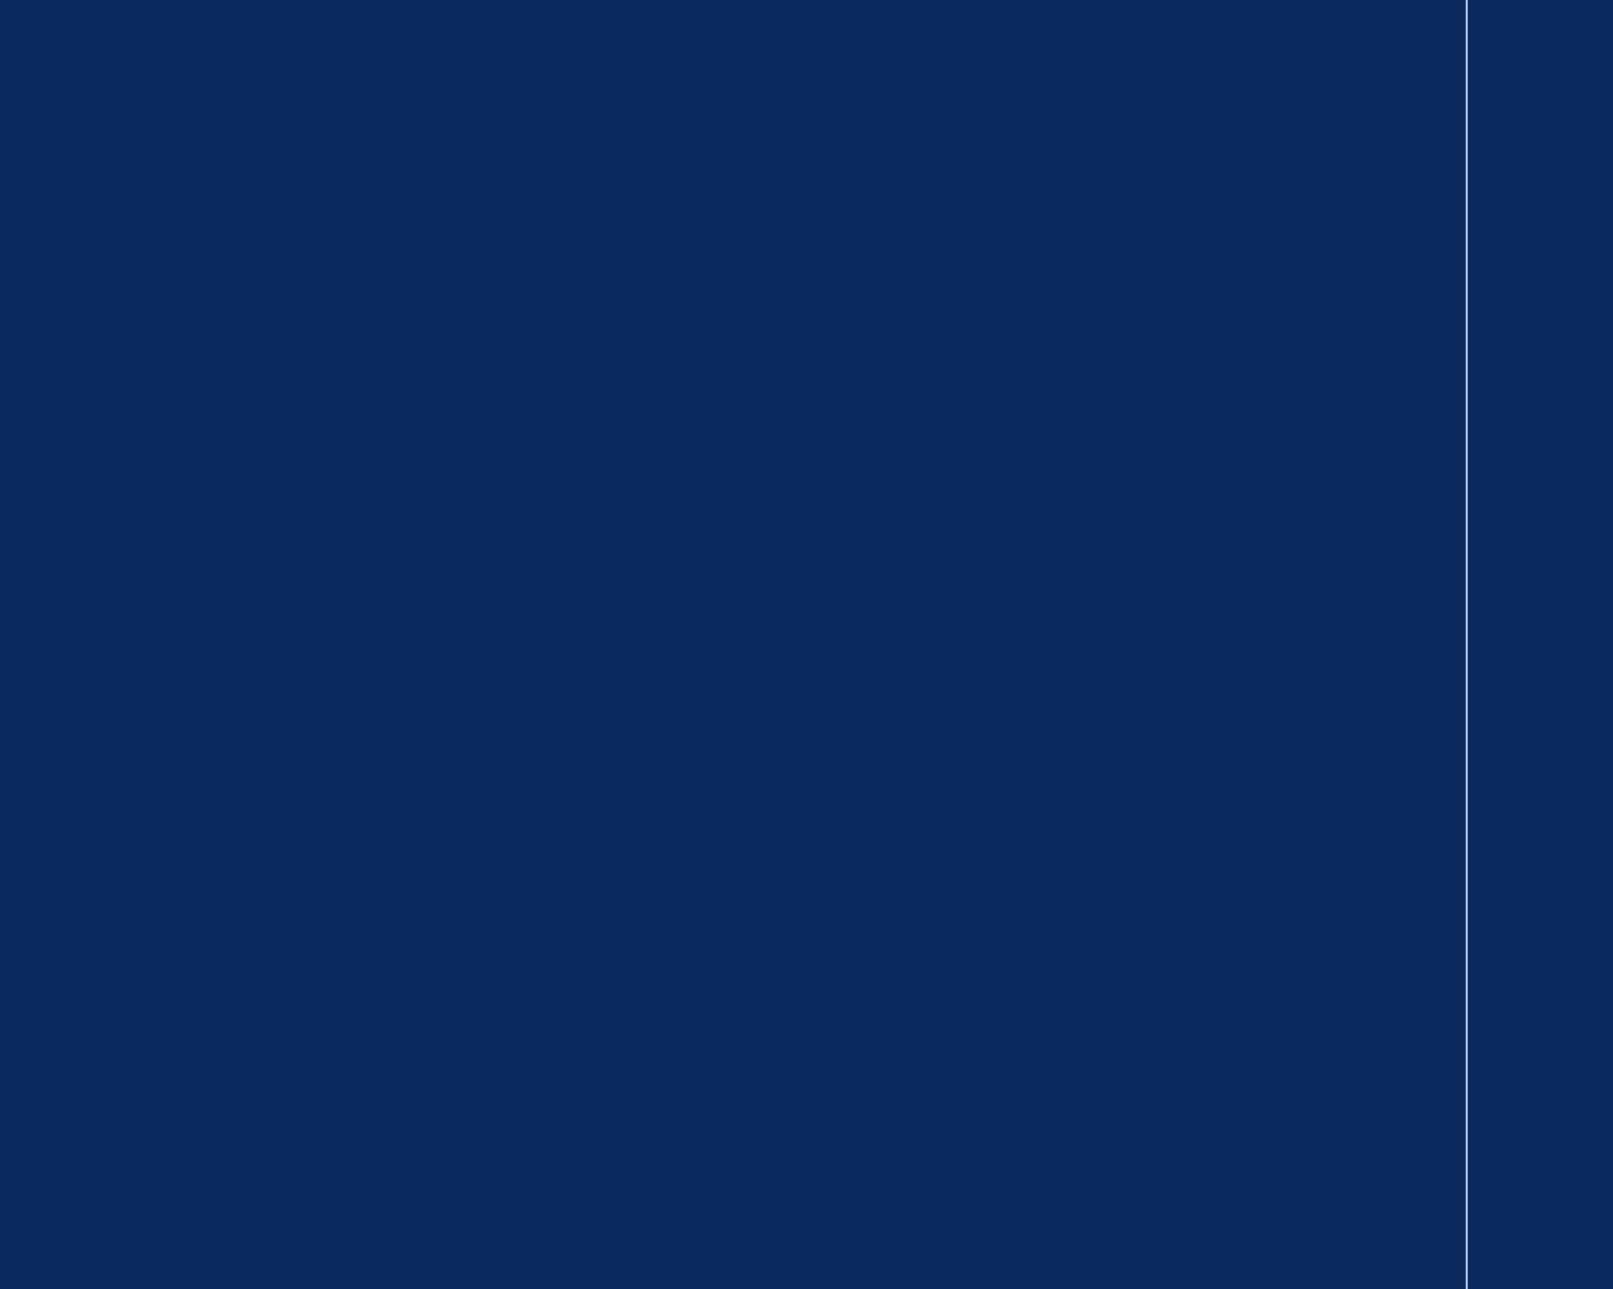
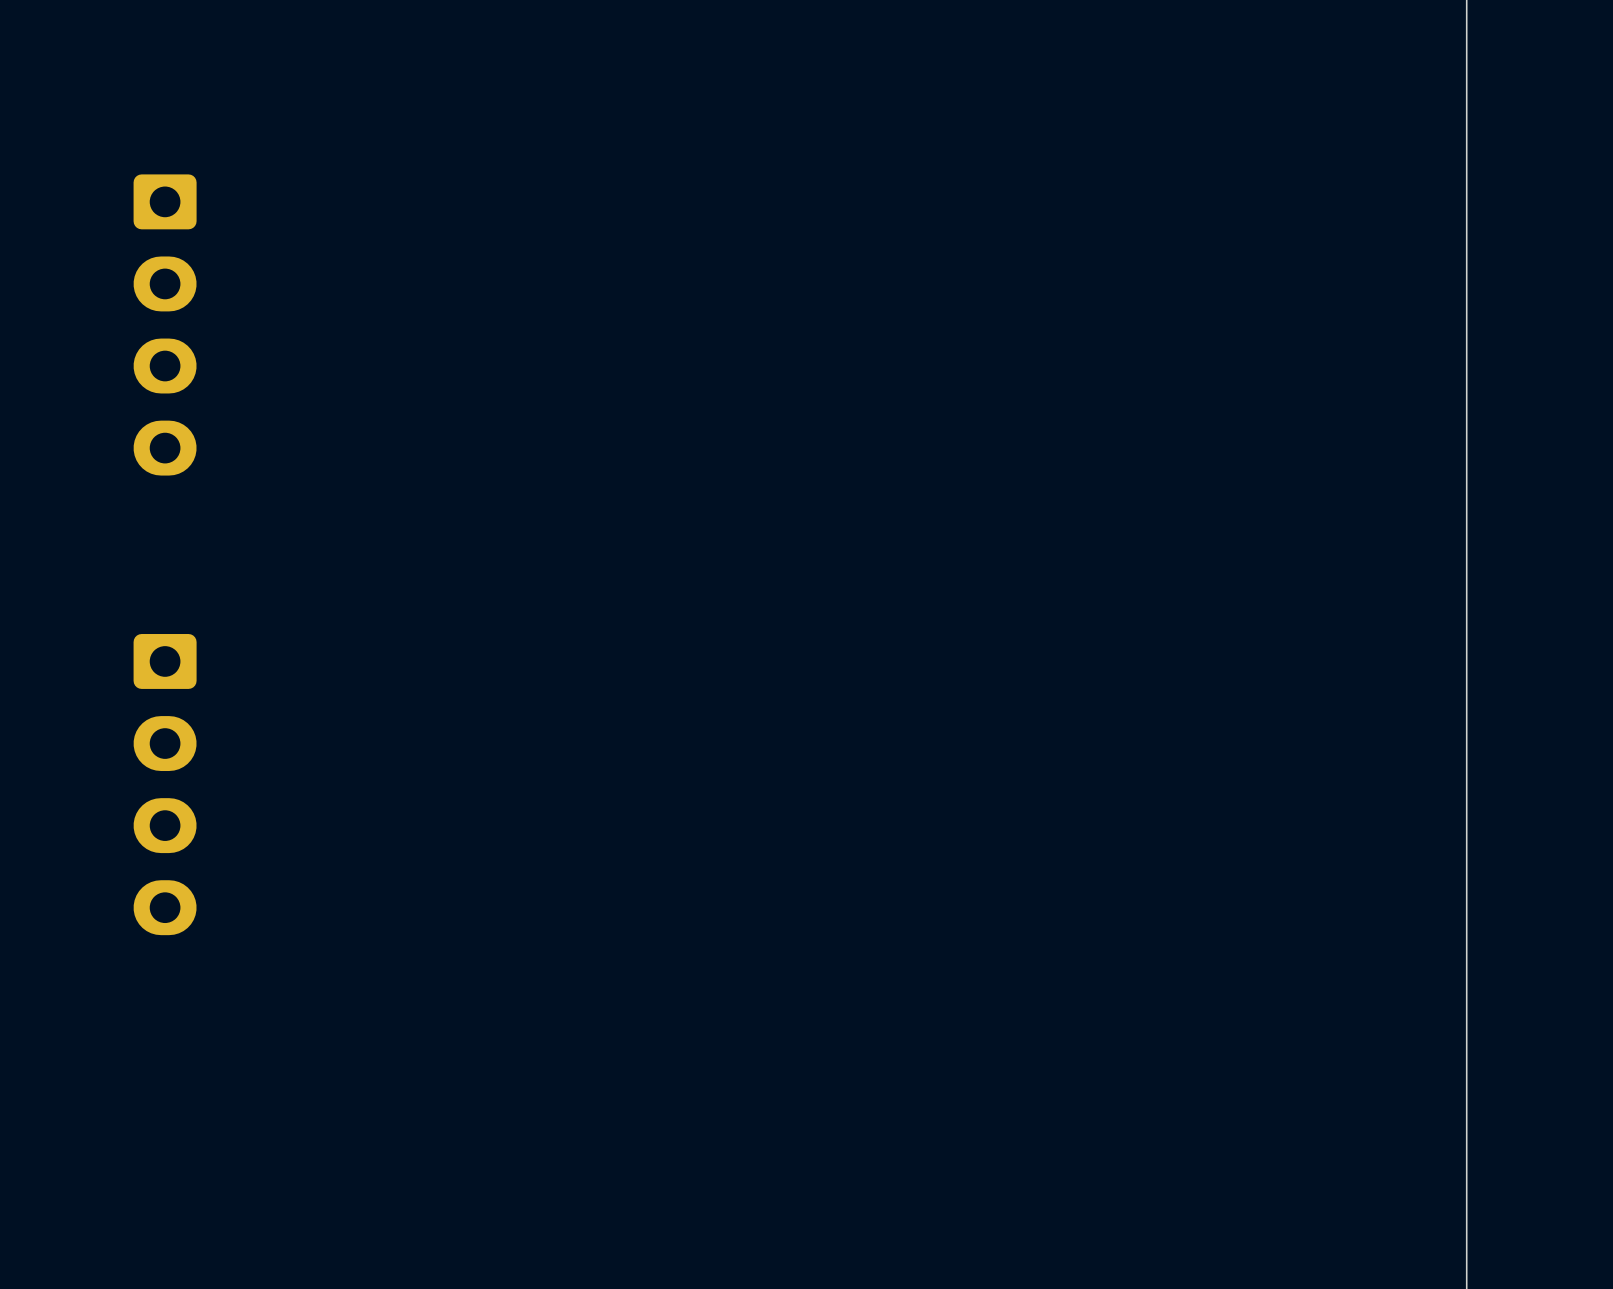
part: none -> (165, 324)
part: none -> (165, 784)

